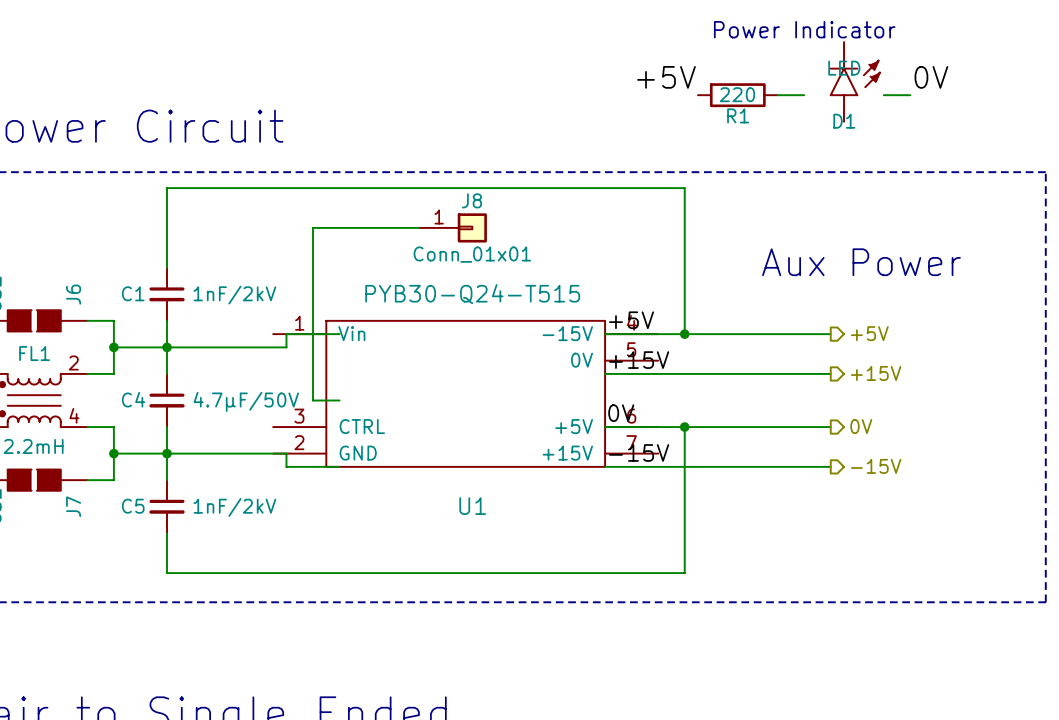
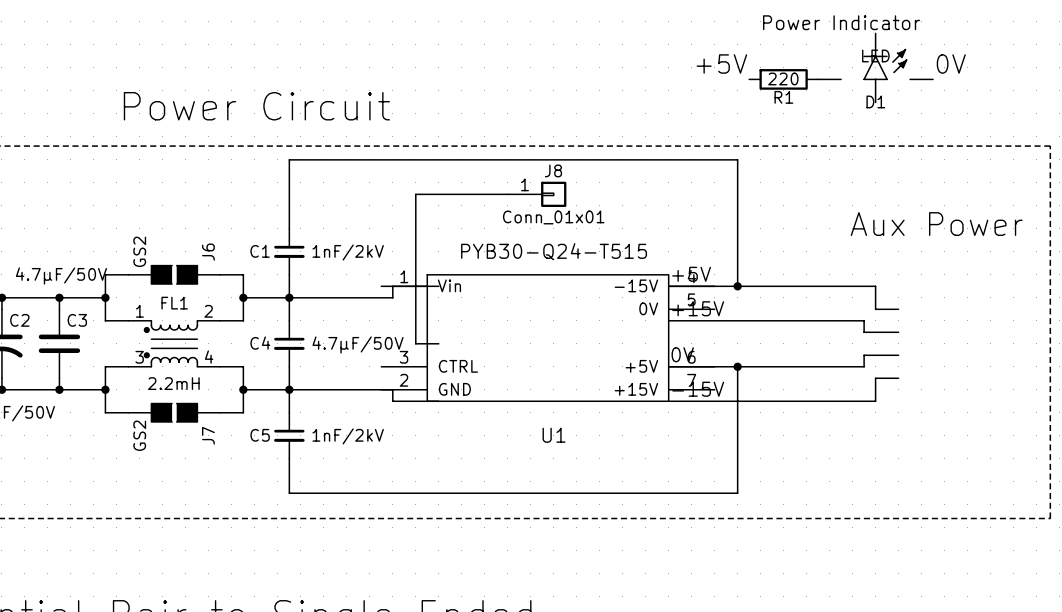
text position: Aux Power (861, 262) -> Aux Power (936, 224)
hierarchical label: +5V (869, 333) -> none
wire: none -> (864, 286) (875, 286) (875, 309) (898, 309)
wire: none -> (864, 320) (864, 332) (898, 332)
hierarchical label: +15V (876, 373) -> none
wire: none -> (898, 355) (864, 355) (864, 366)
hierarchical label: 0V (861, 426) -> none
wire: none -> (898, 378) (875, 378) (875, 401) (864, 401)
hierarchical label: -15V (876, 466) -> none

